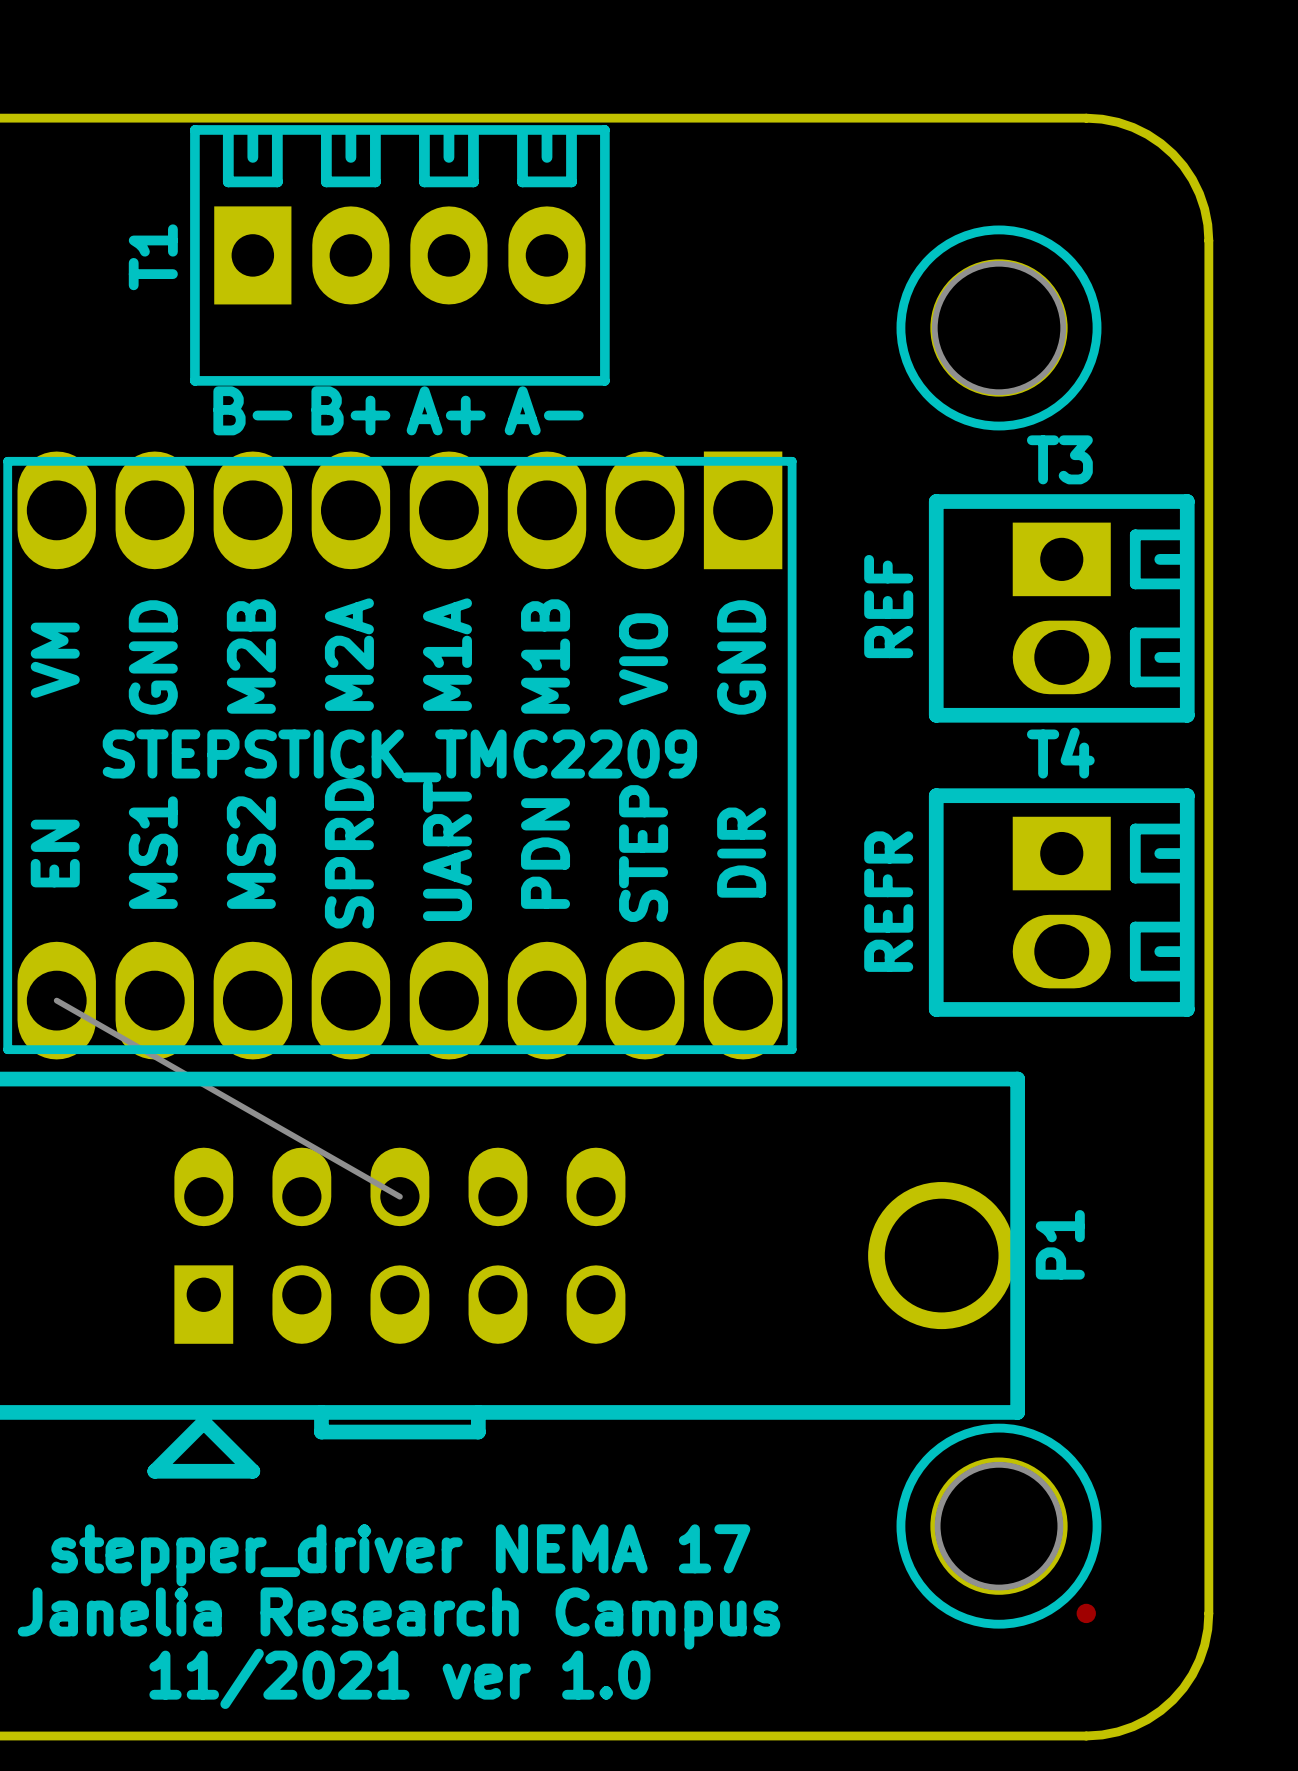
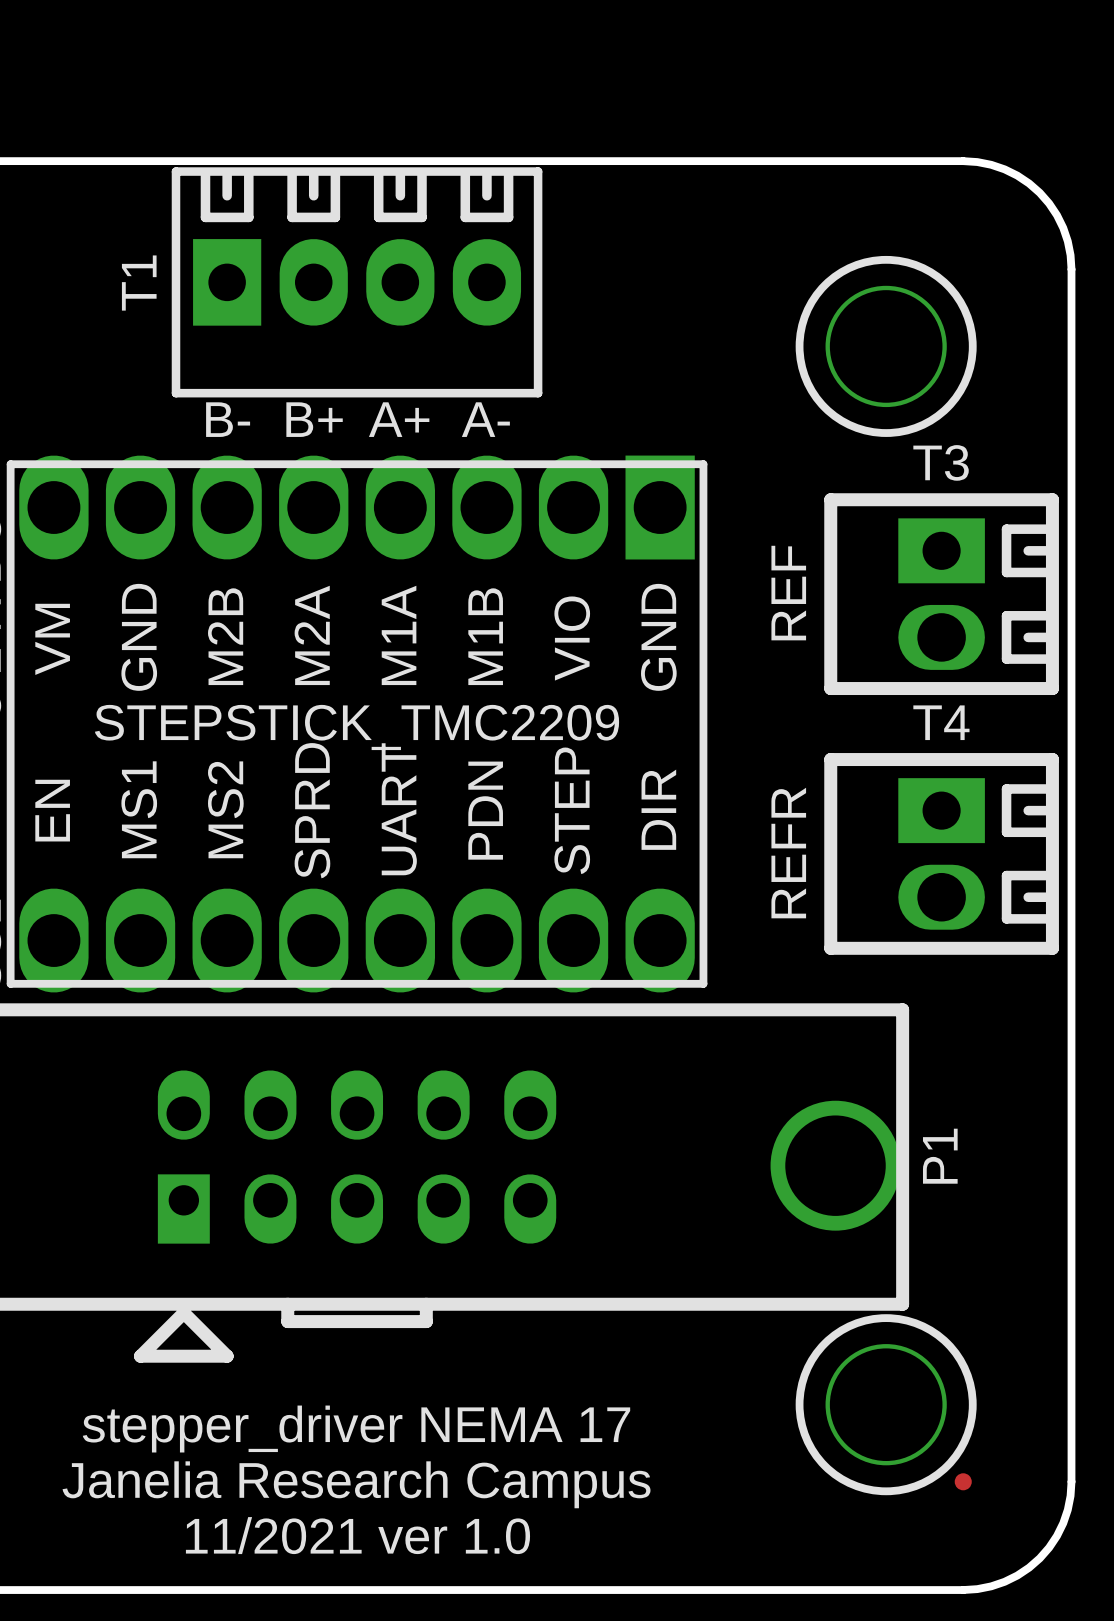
drawing: [931, 260, 1067, 396] -> none
line: (56, 1000) (399, 1196) -> none
drawing: [934, 1461, 1064, 1591] -> none

